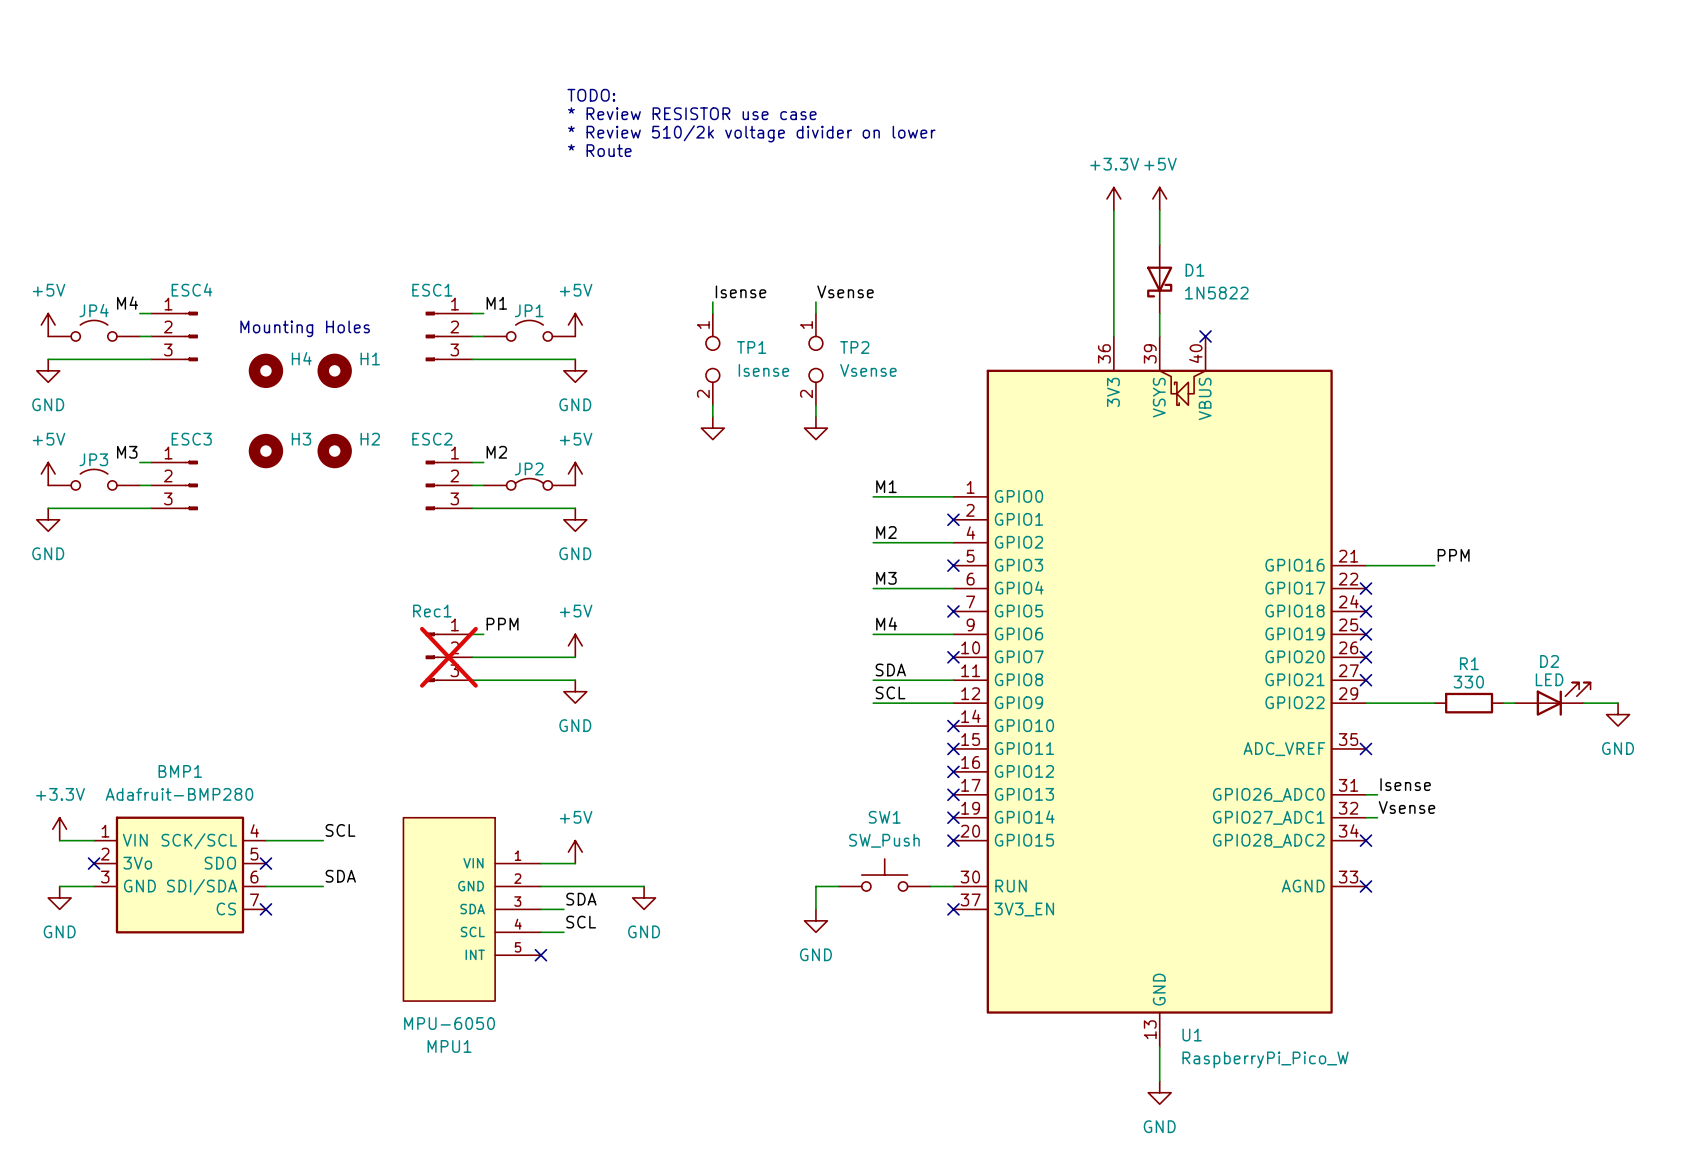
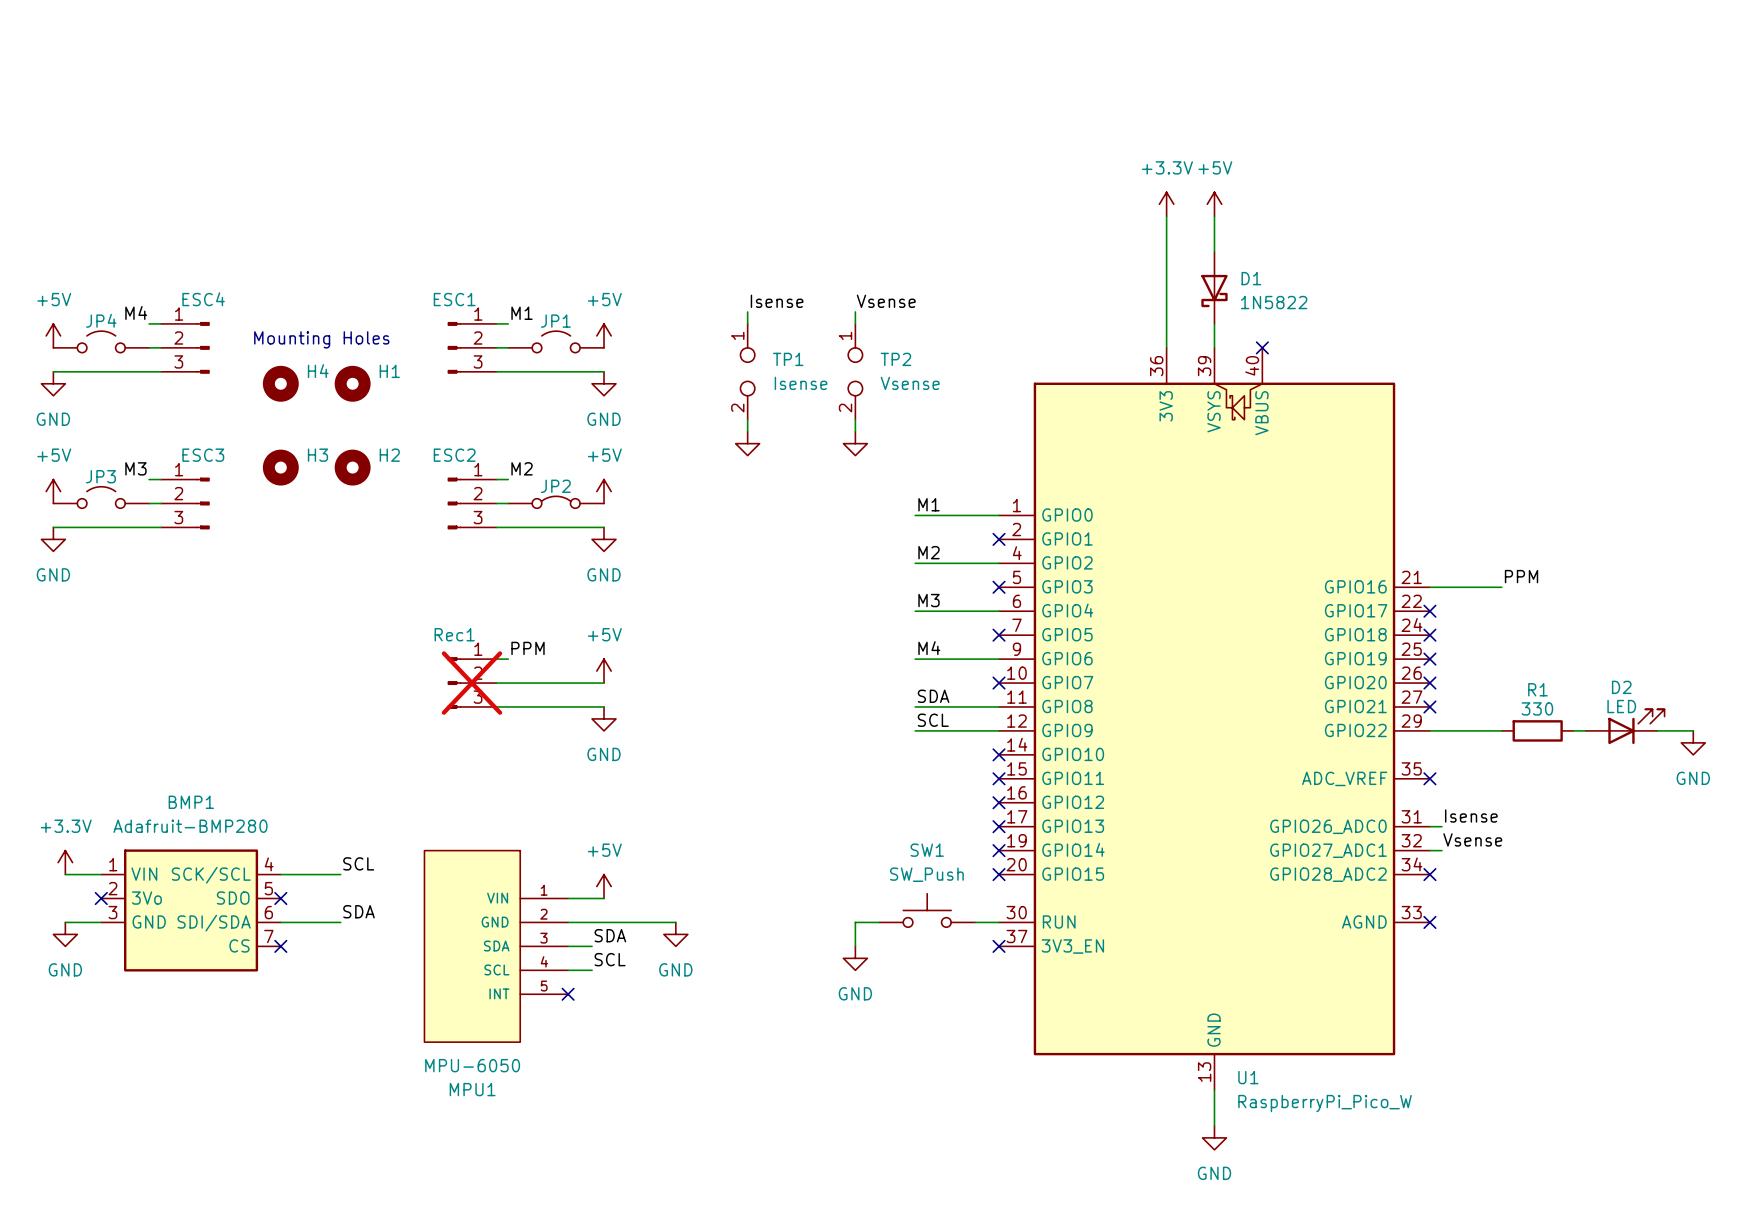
text: TODO: (591, 95) -> none
text: * Review RESISTOR use case (692, 113) -> none
text: * Review 510/2k voltage divider on lower (751, 133) -> none
text: * Route (599, 150) -> none

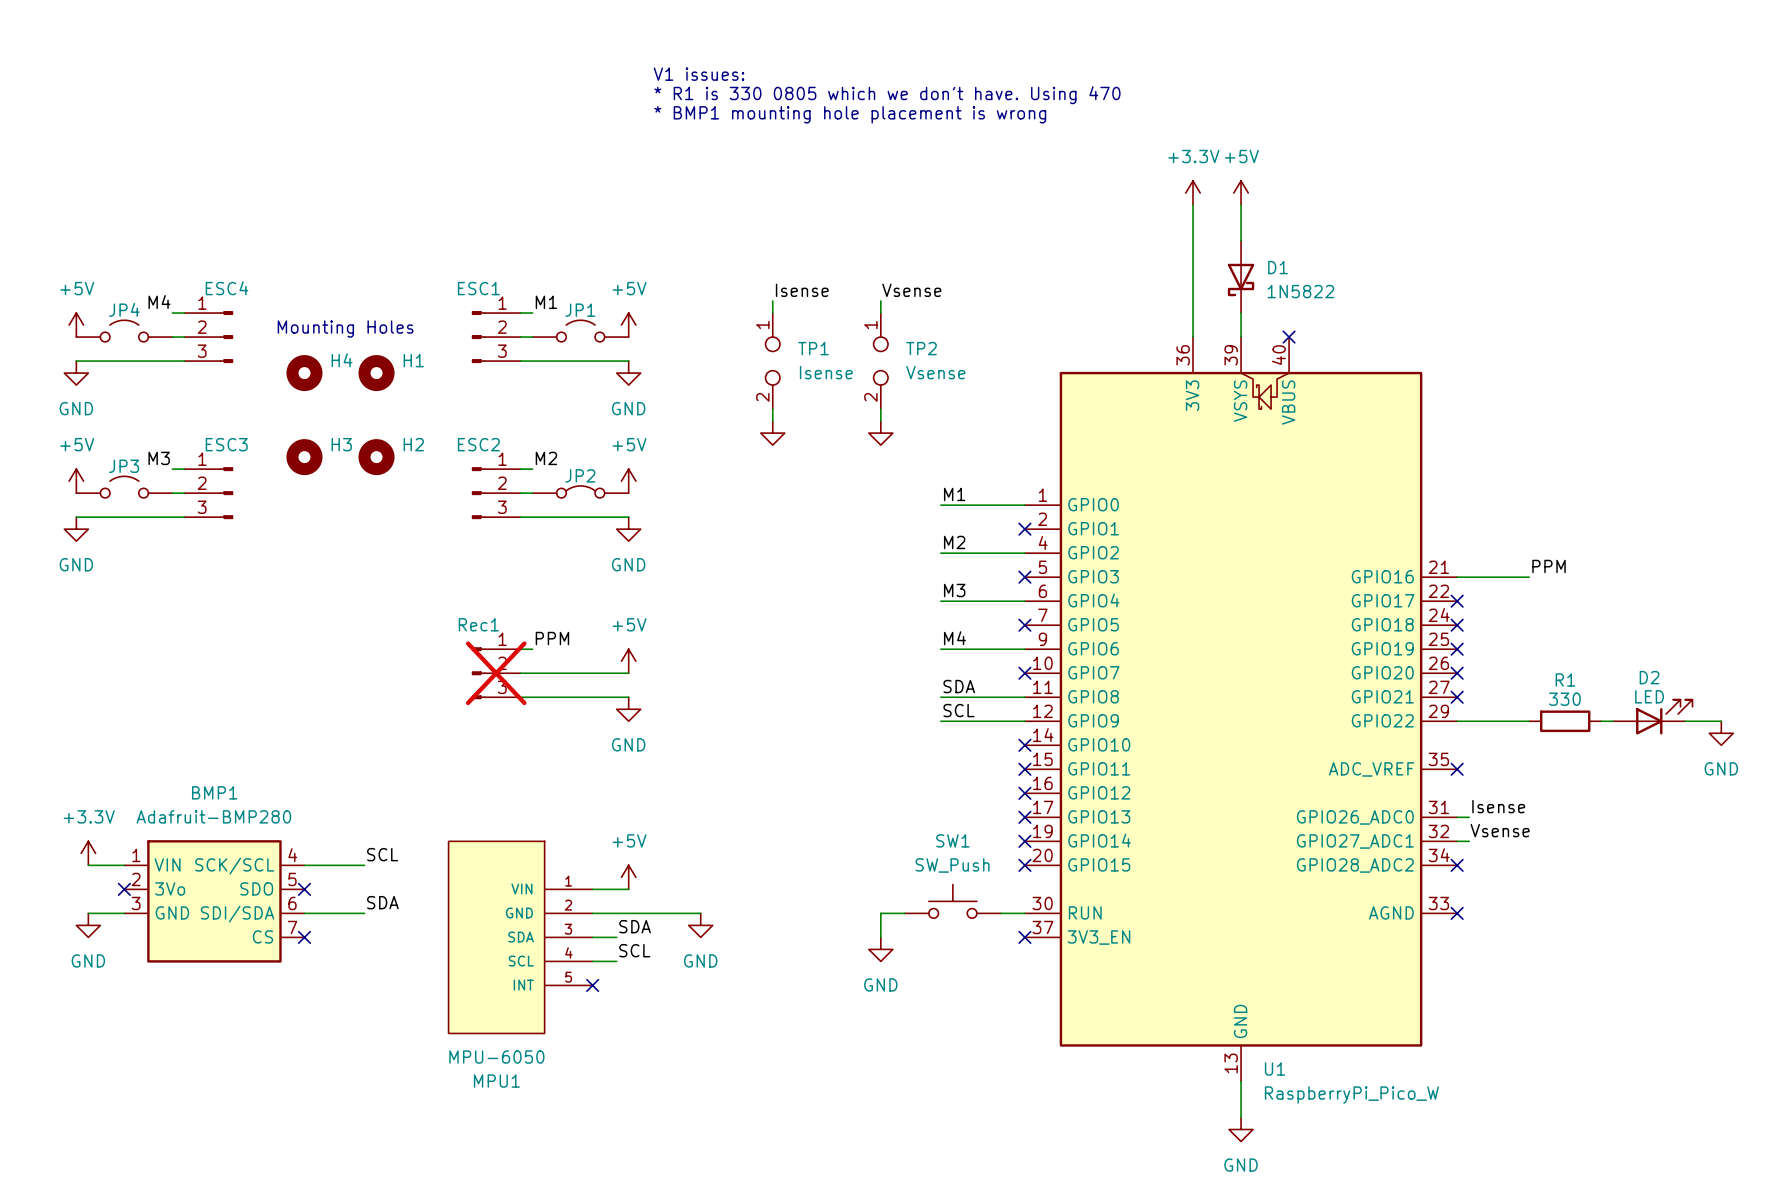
text: none -> V1 issues: (698, 74)
text: none -> * R1 is 330 0805 which we don't have. Using 470 (887, 95)
text: none -> * BMP1 mounting hole placement is wrong (850, 114)

